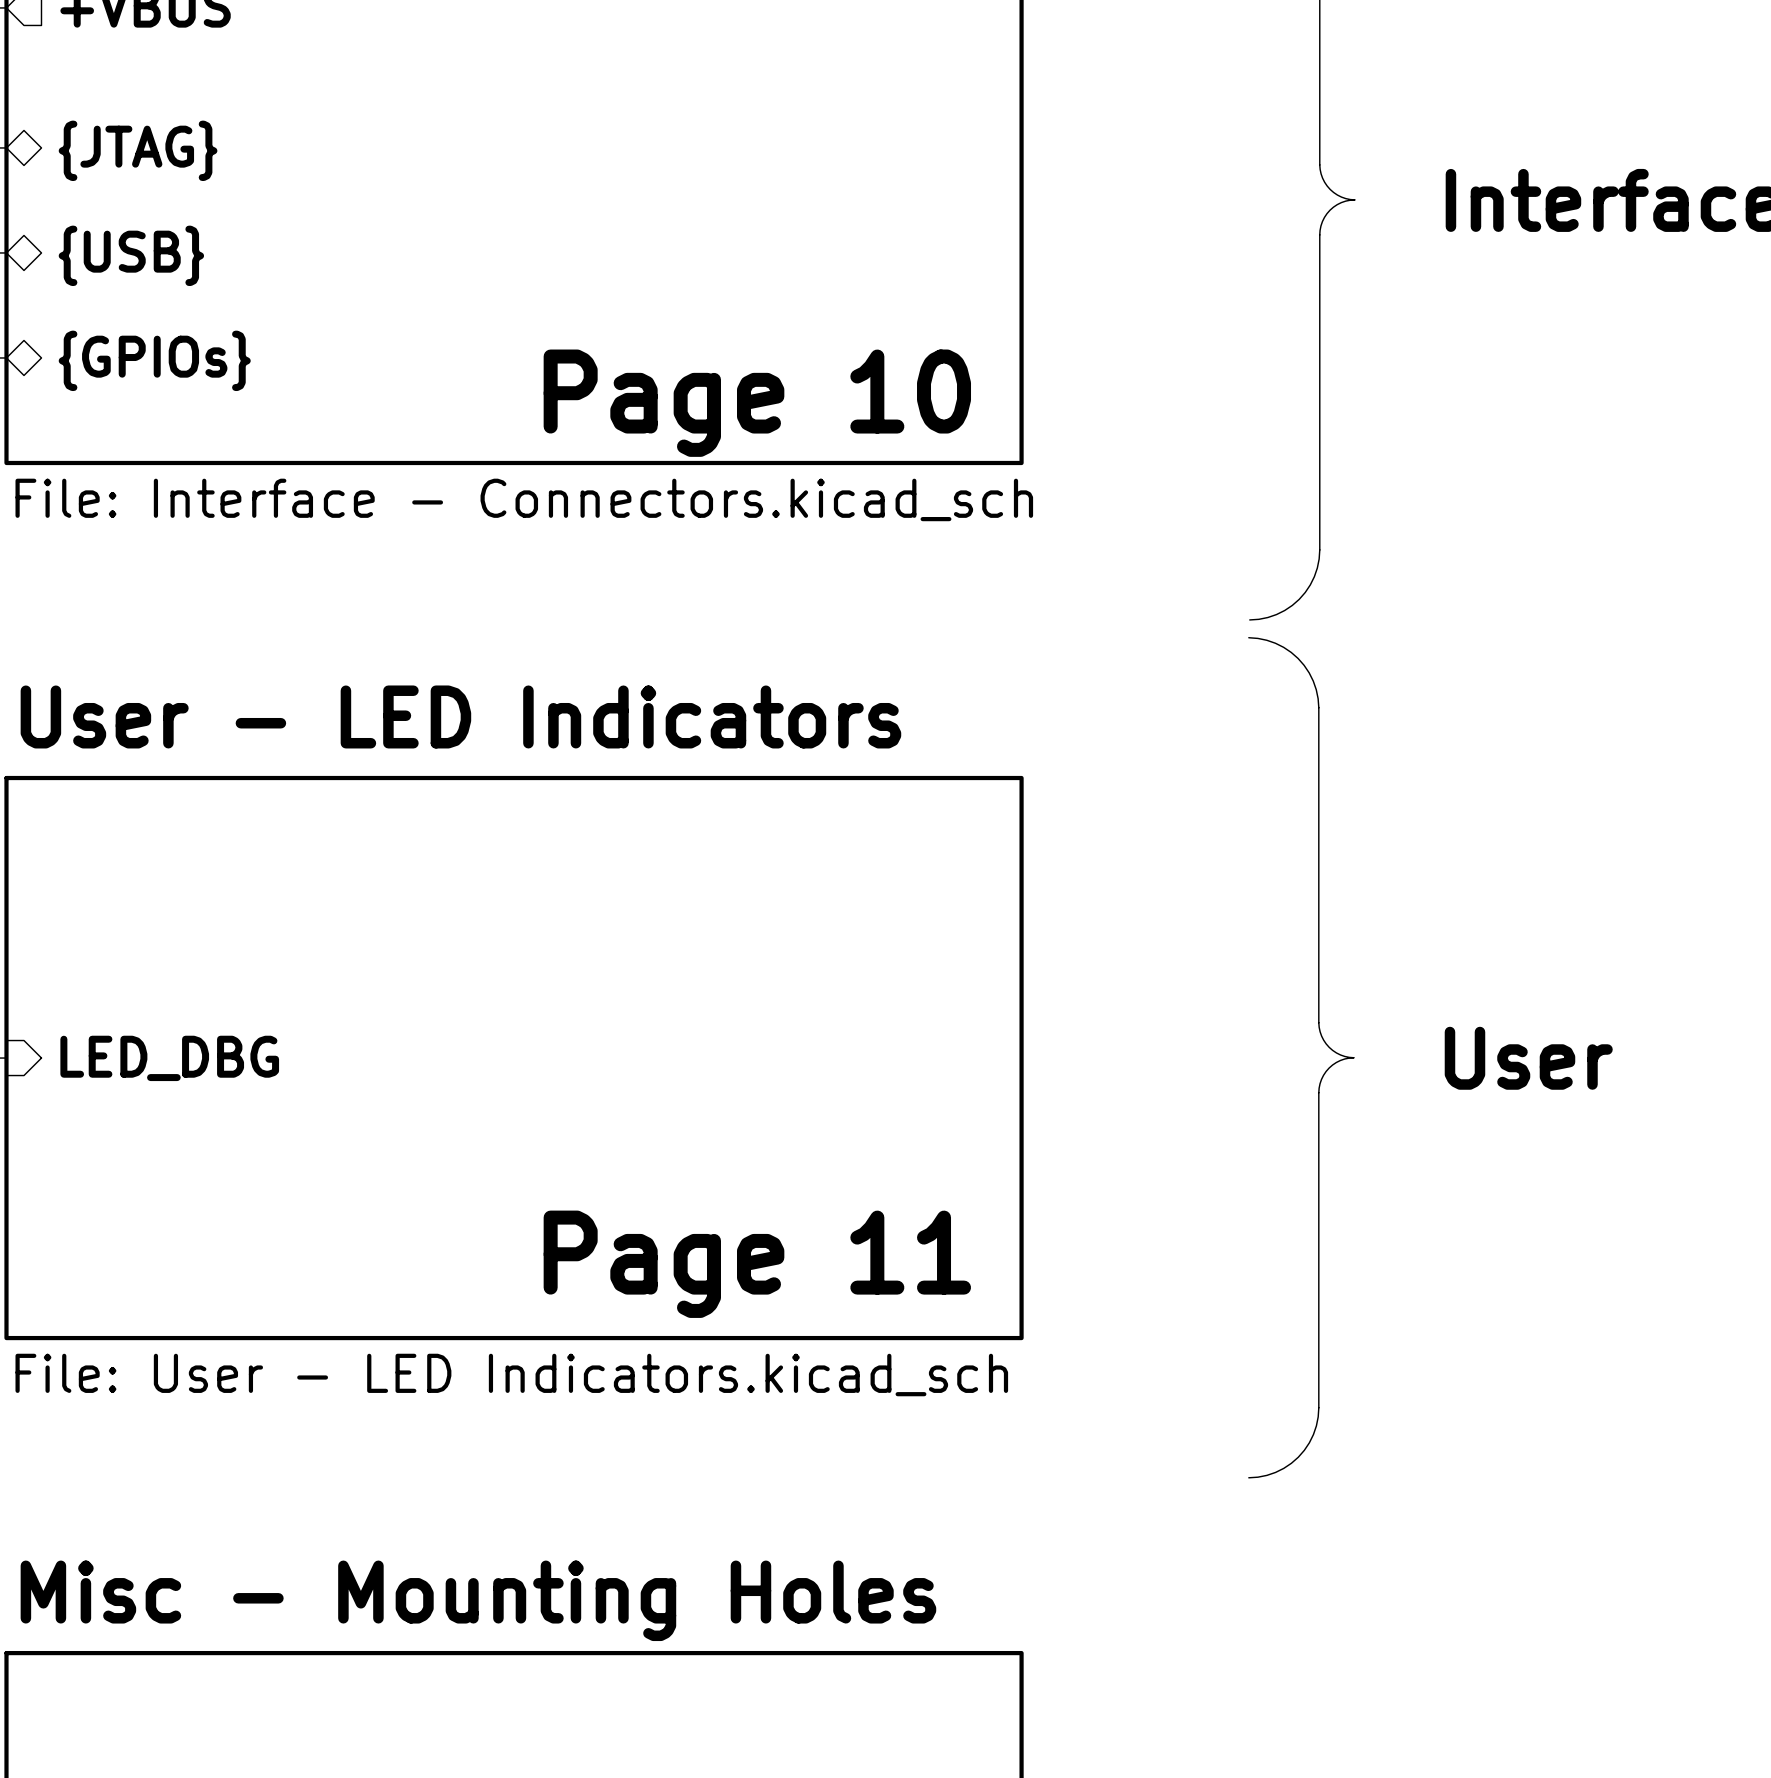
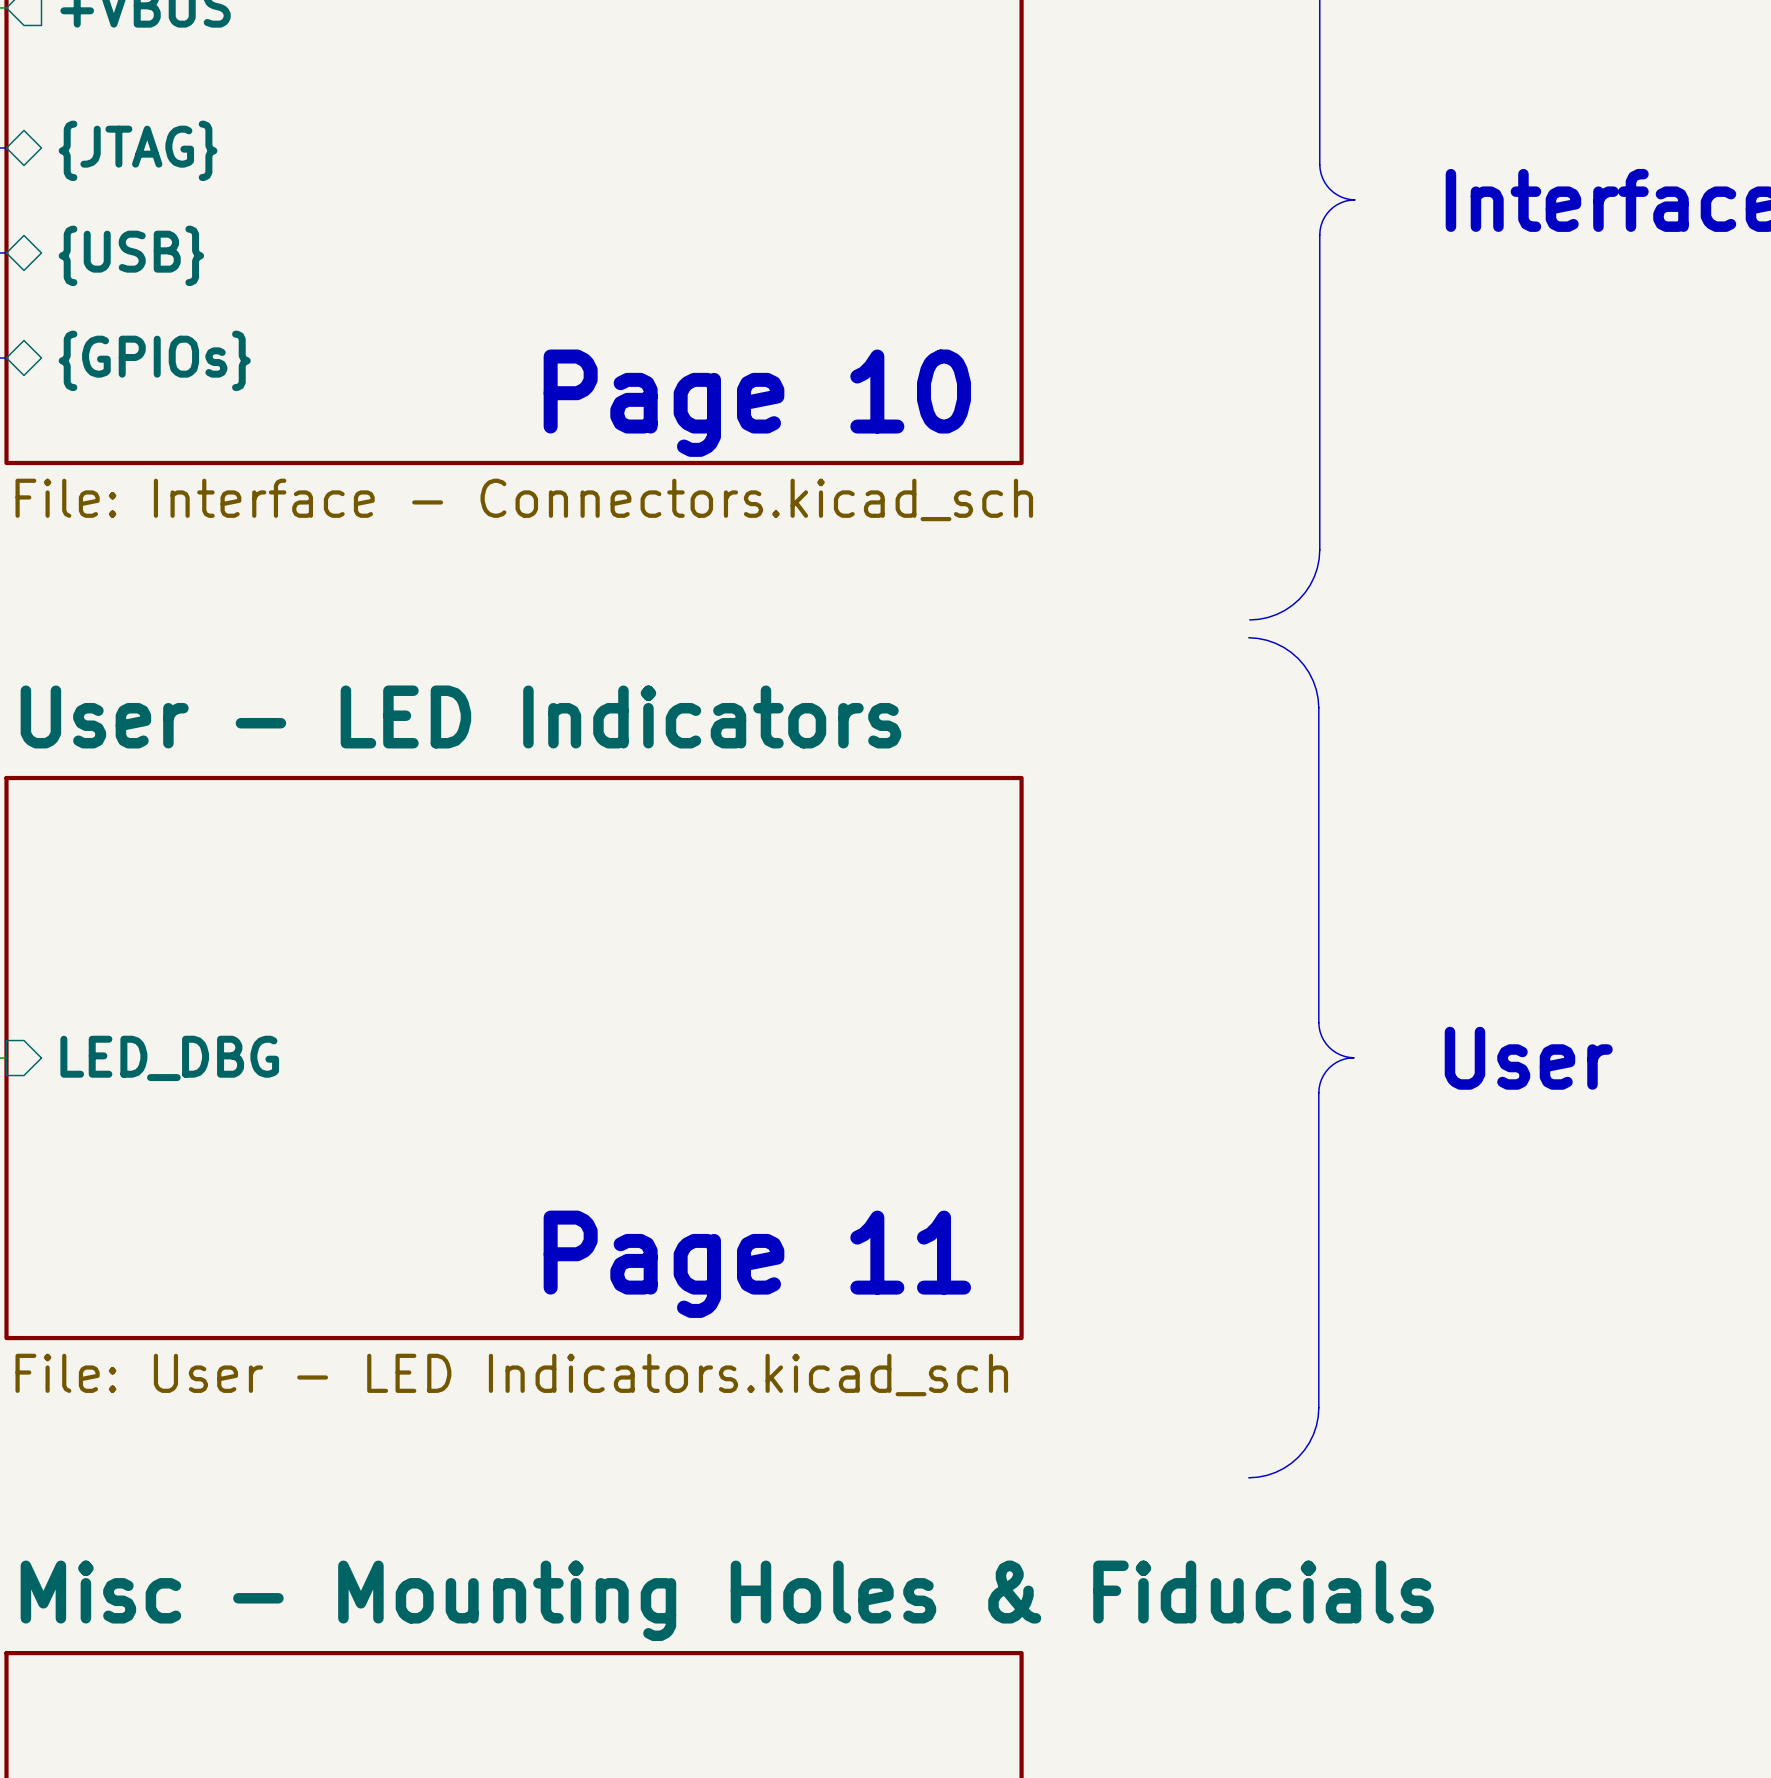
sheet Misc - Mounting Holes name: Misc - Mounting Holes (478, 1600) -> Misc - Mounting Holes & Fiducials (727, 1600)

